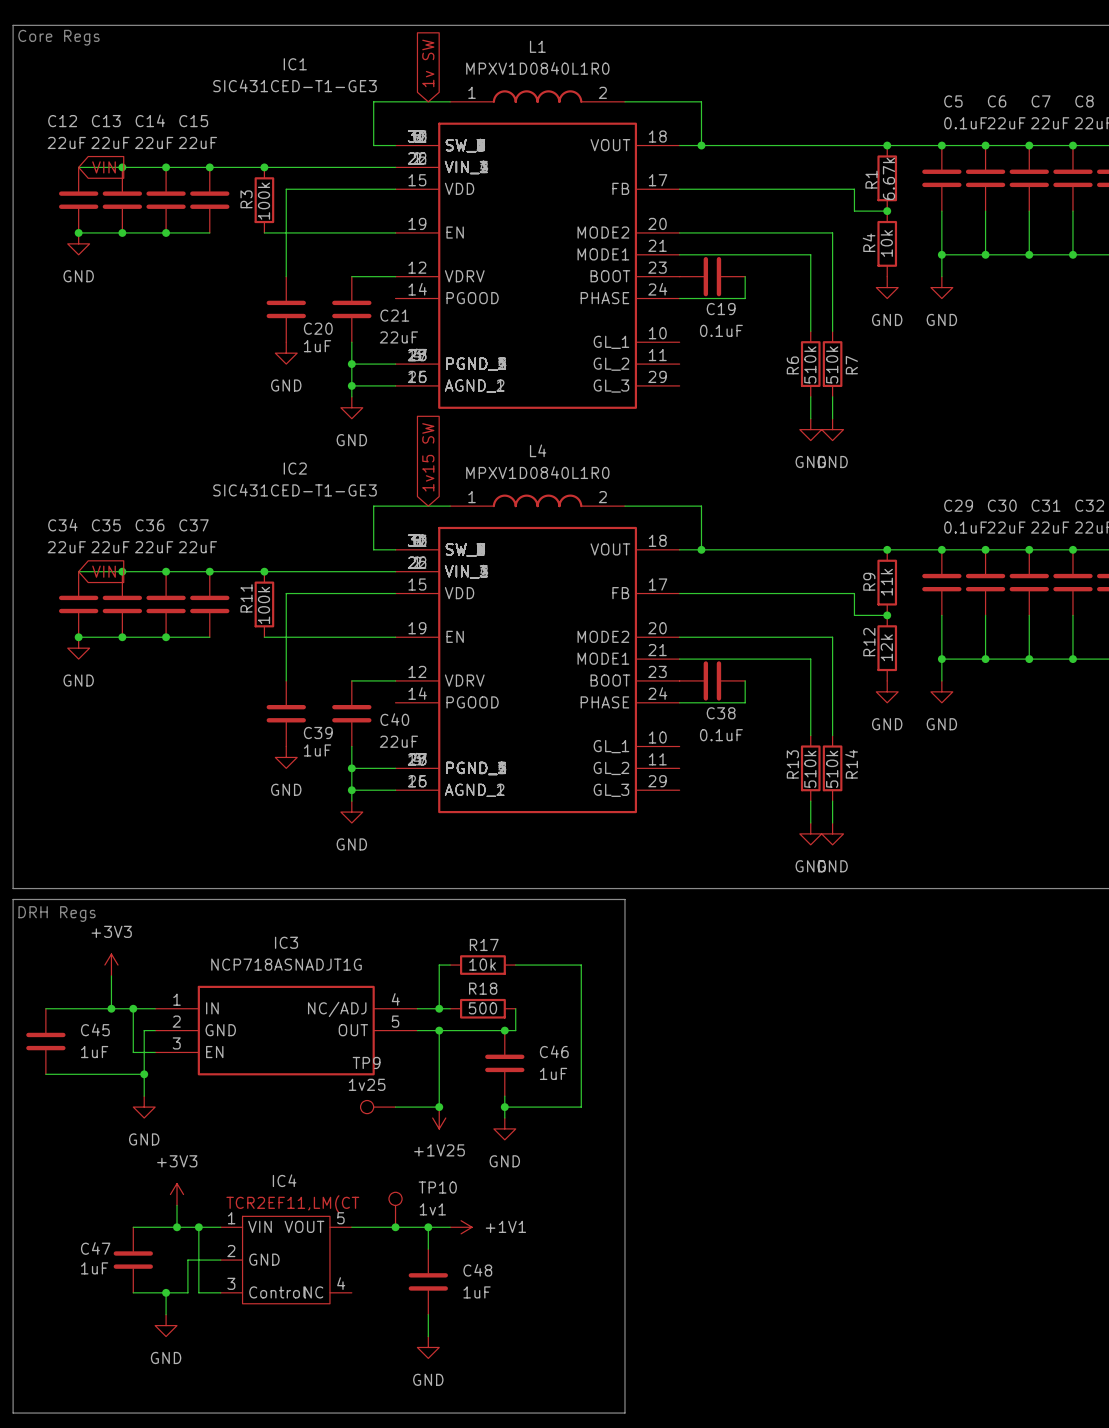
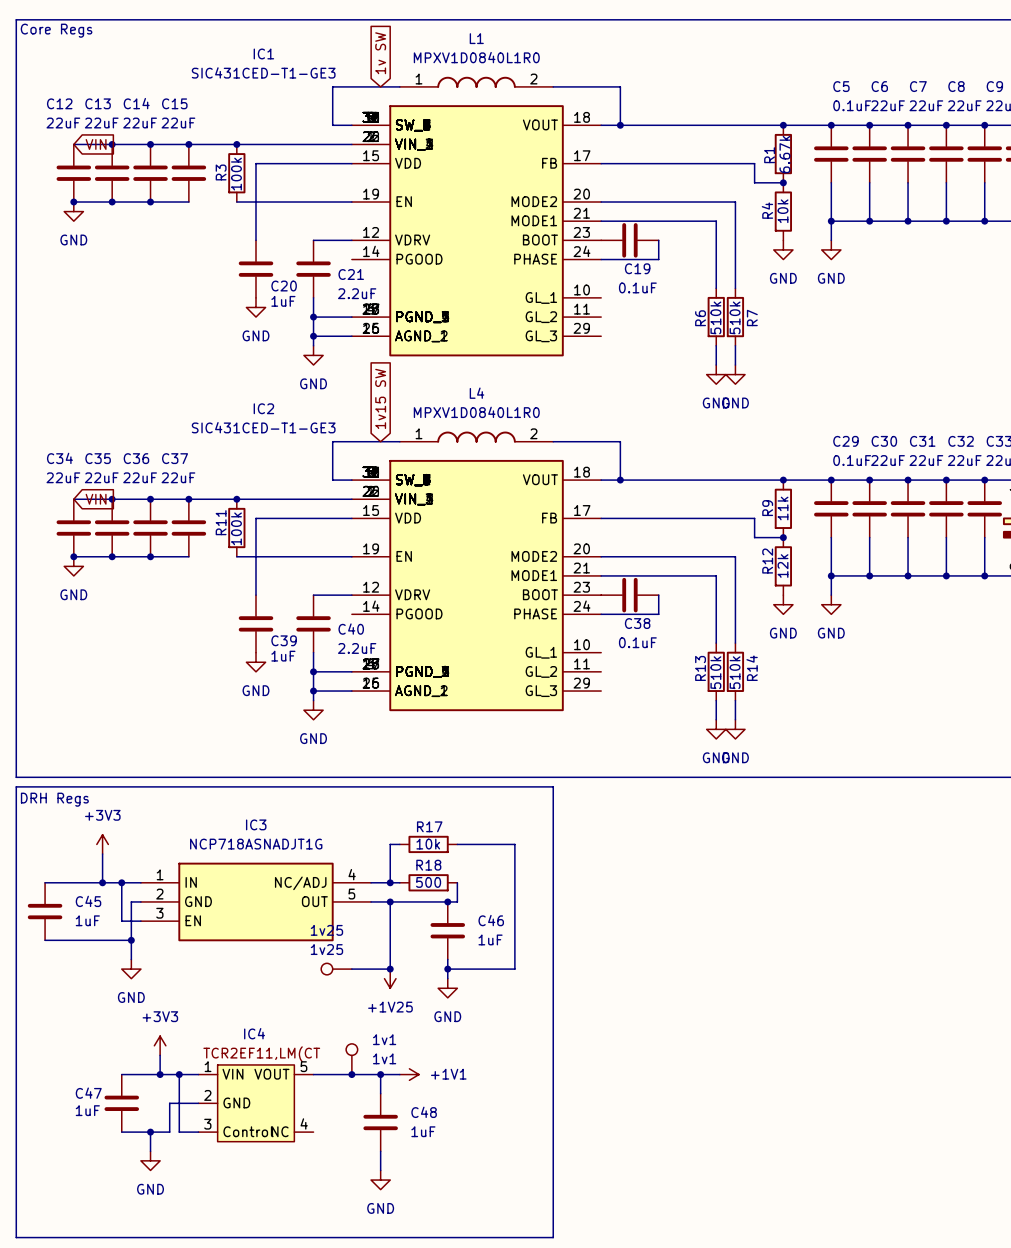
C21 value: 22uF (398, 337) -> 2.2uF (357, 293)
C40 value: 22uF (398, 741) -> 2.2uF (357, 648)
TP9 name: TP9 (366, 1062) -> 1v25 (326, 930)
TP10 name: TP10 (437, 1187) -> 1v1 (384, 1039)

